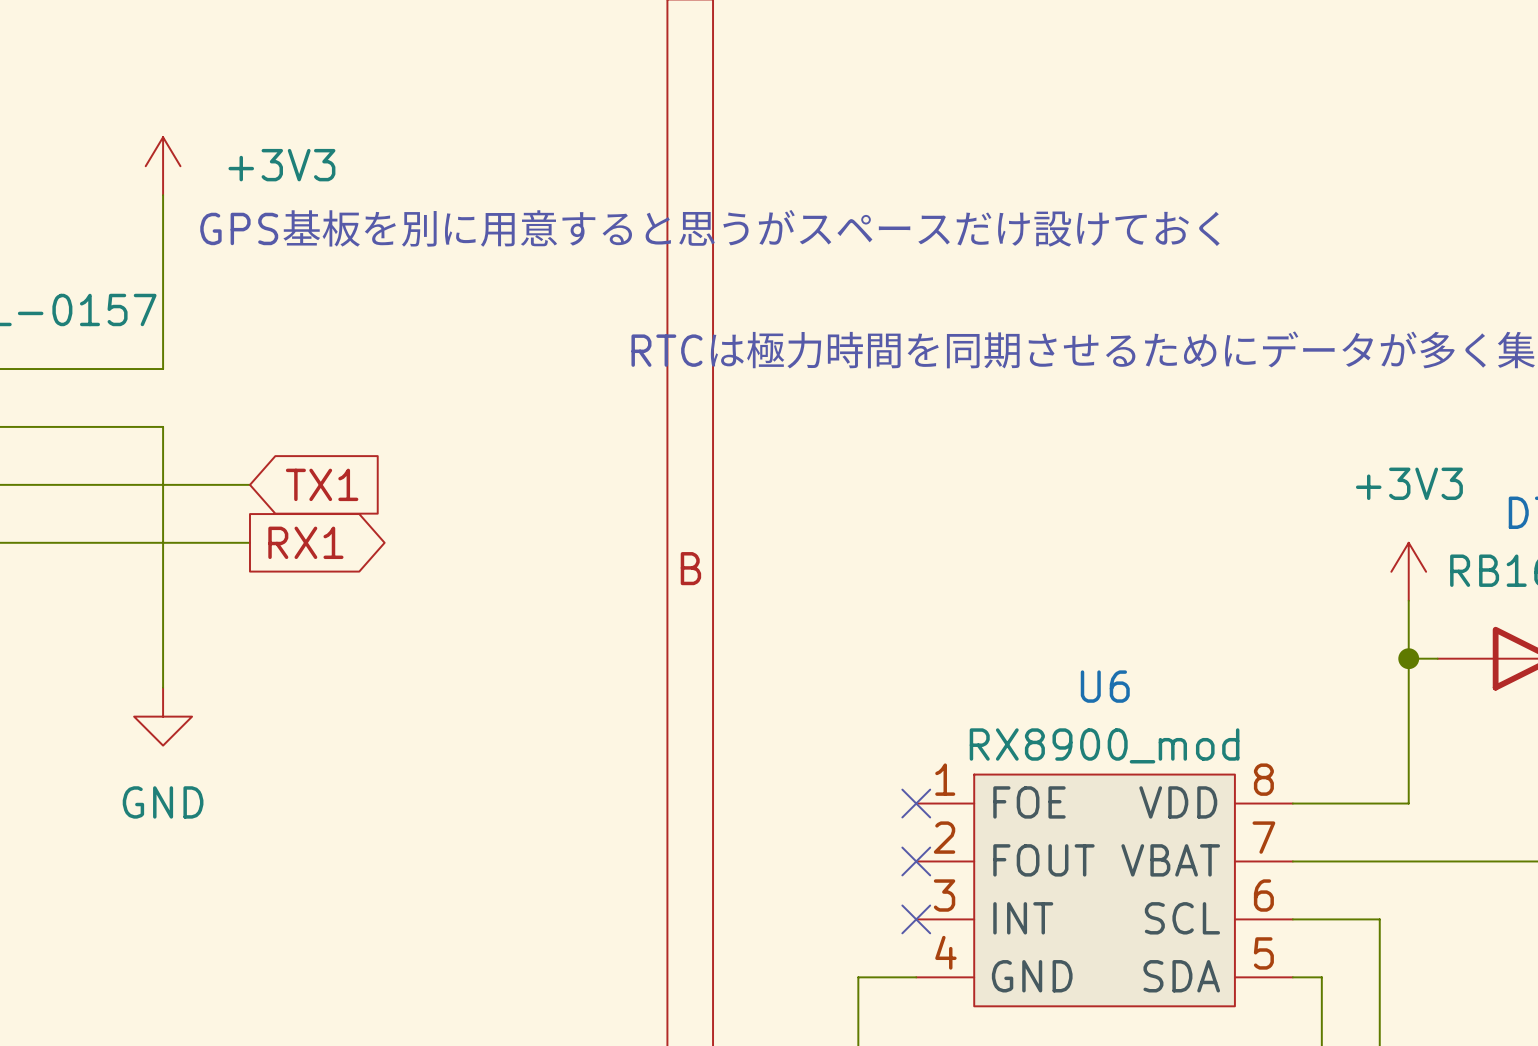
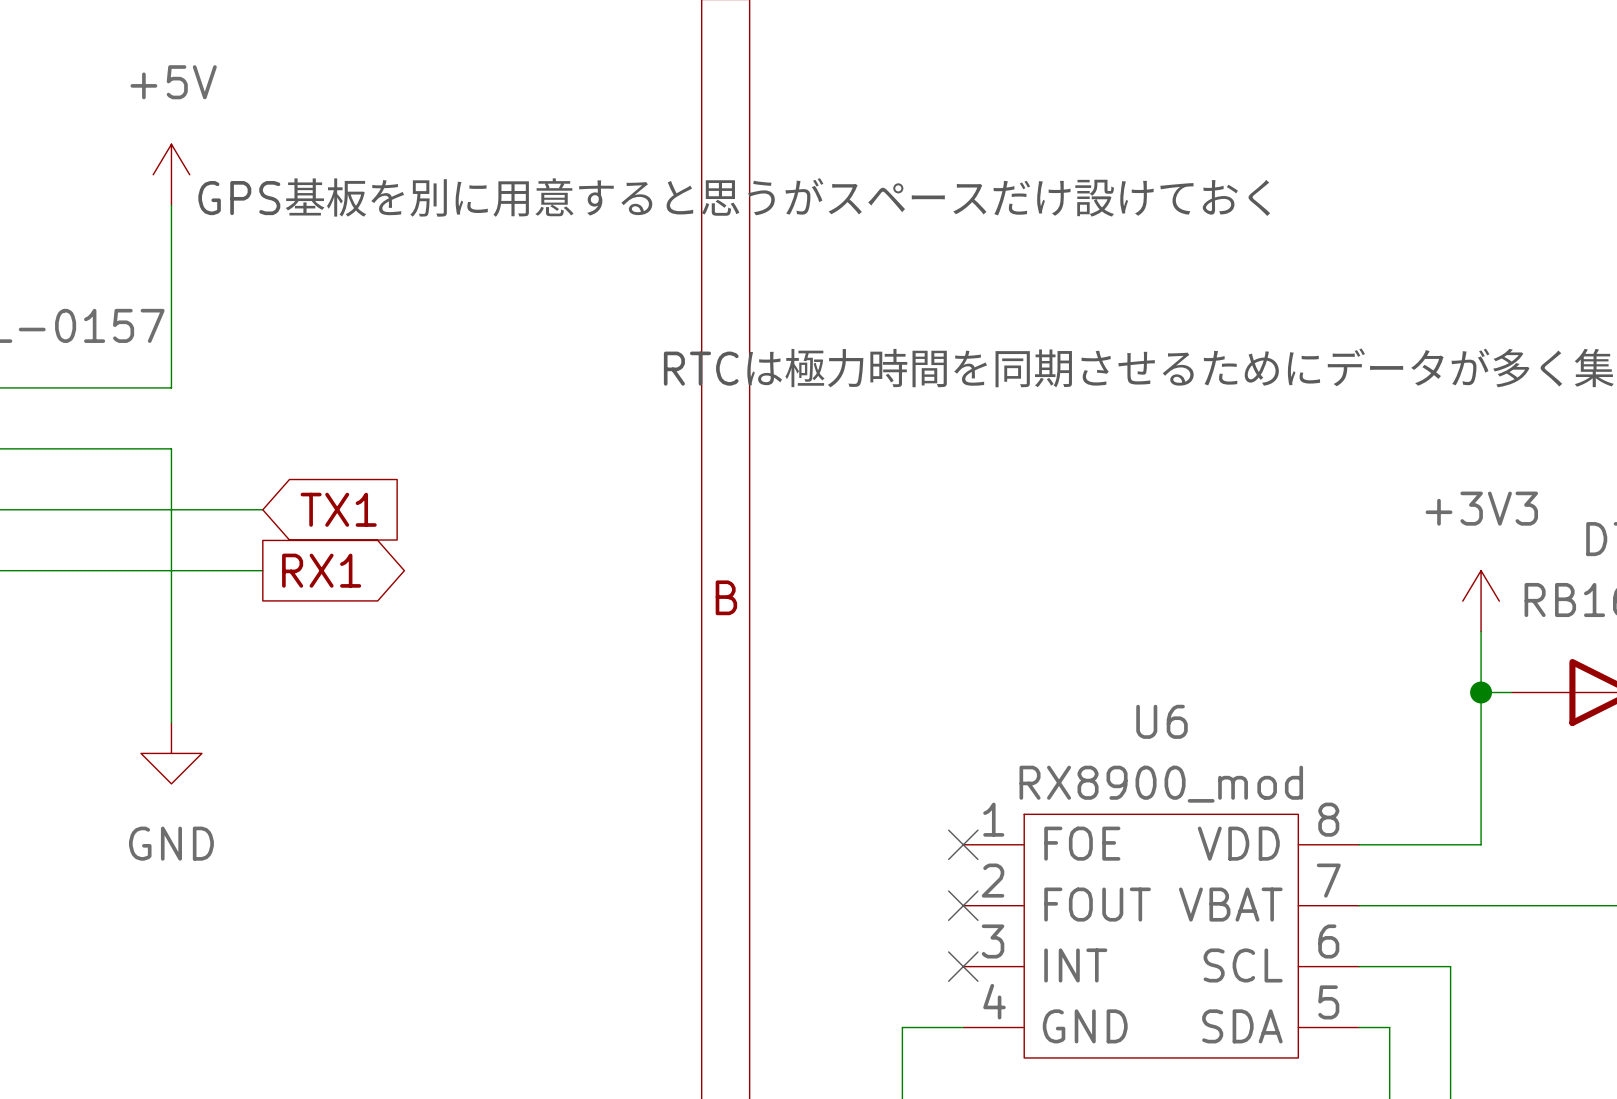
power symbol: +3V3 (163, 166) -> +5V (171, 174)
text position: GPS基板を別に用意すると思うがスペースだけ設けておく (710, 228) -> GPS基板を別に用意すると思うがスペースだけ設けておく (735, 197)

